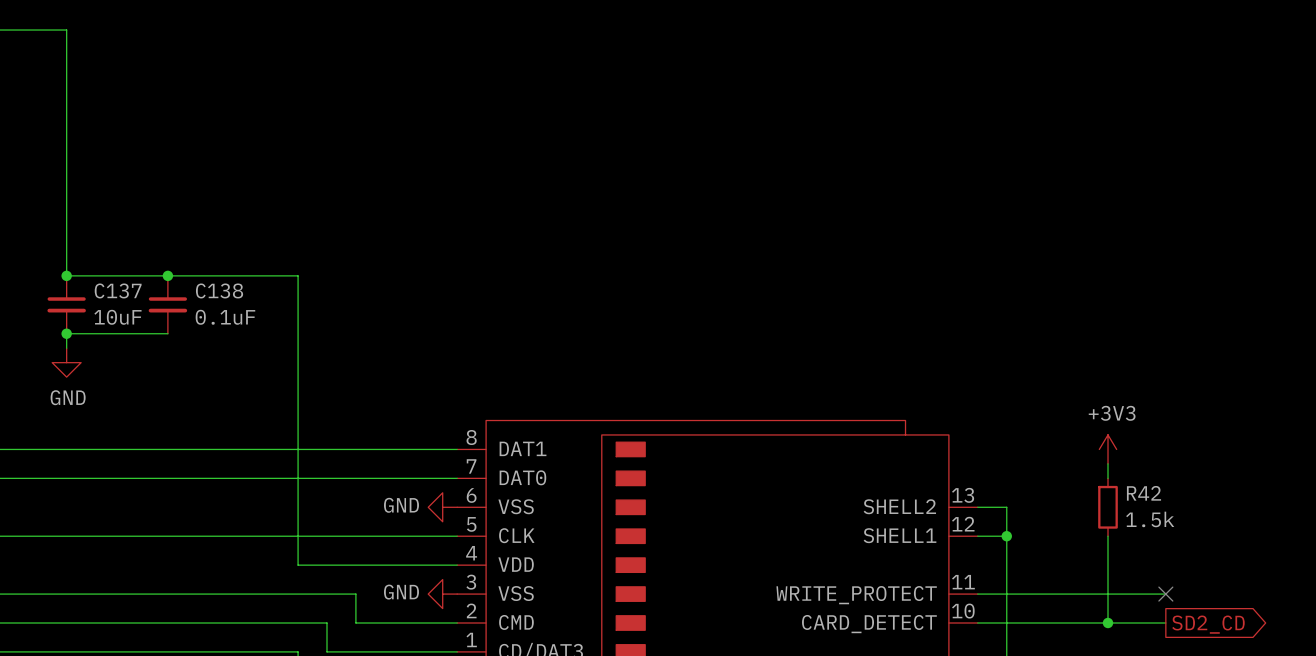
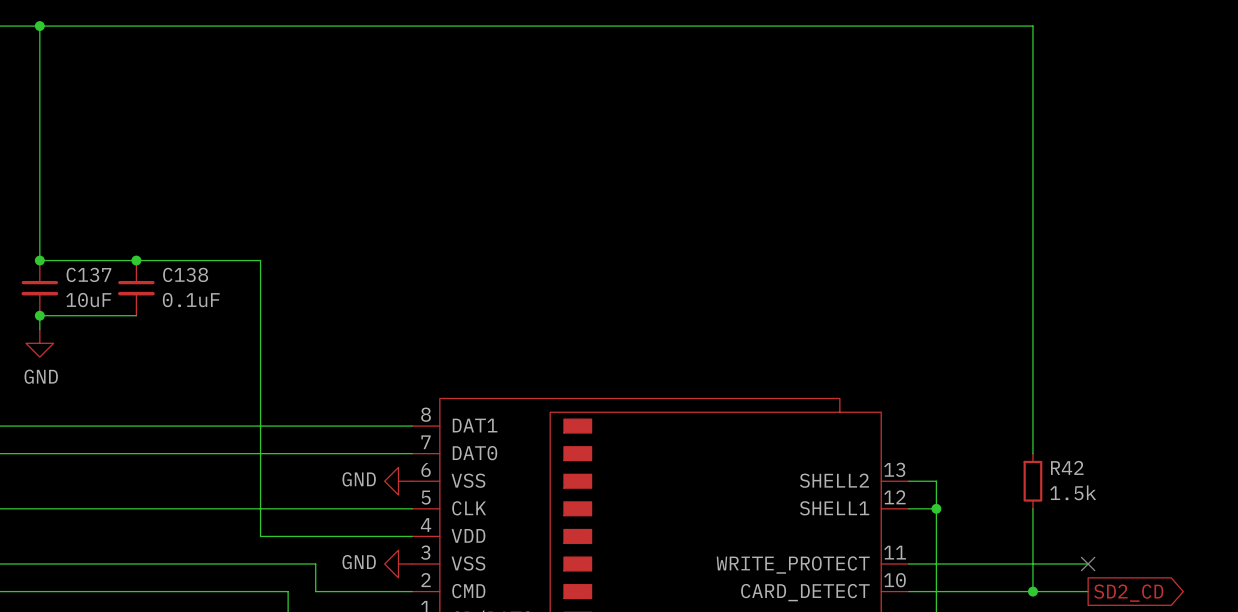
wire: none -> (39, 26) (1032, 26) (1032, 439)
junction: none -> (39, 26)
power symbol: +3V3 (1108, 449) -> none

